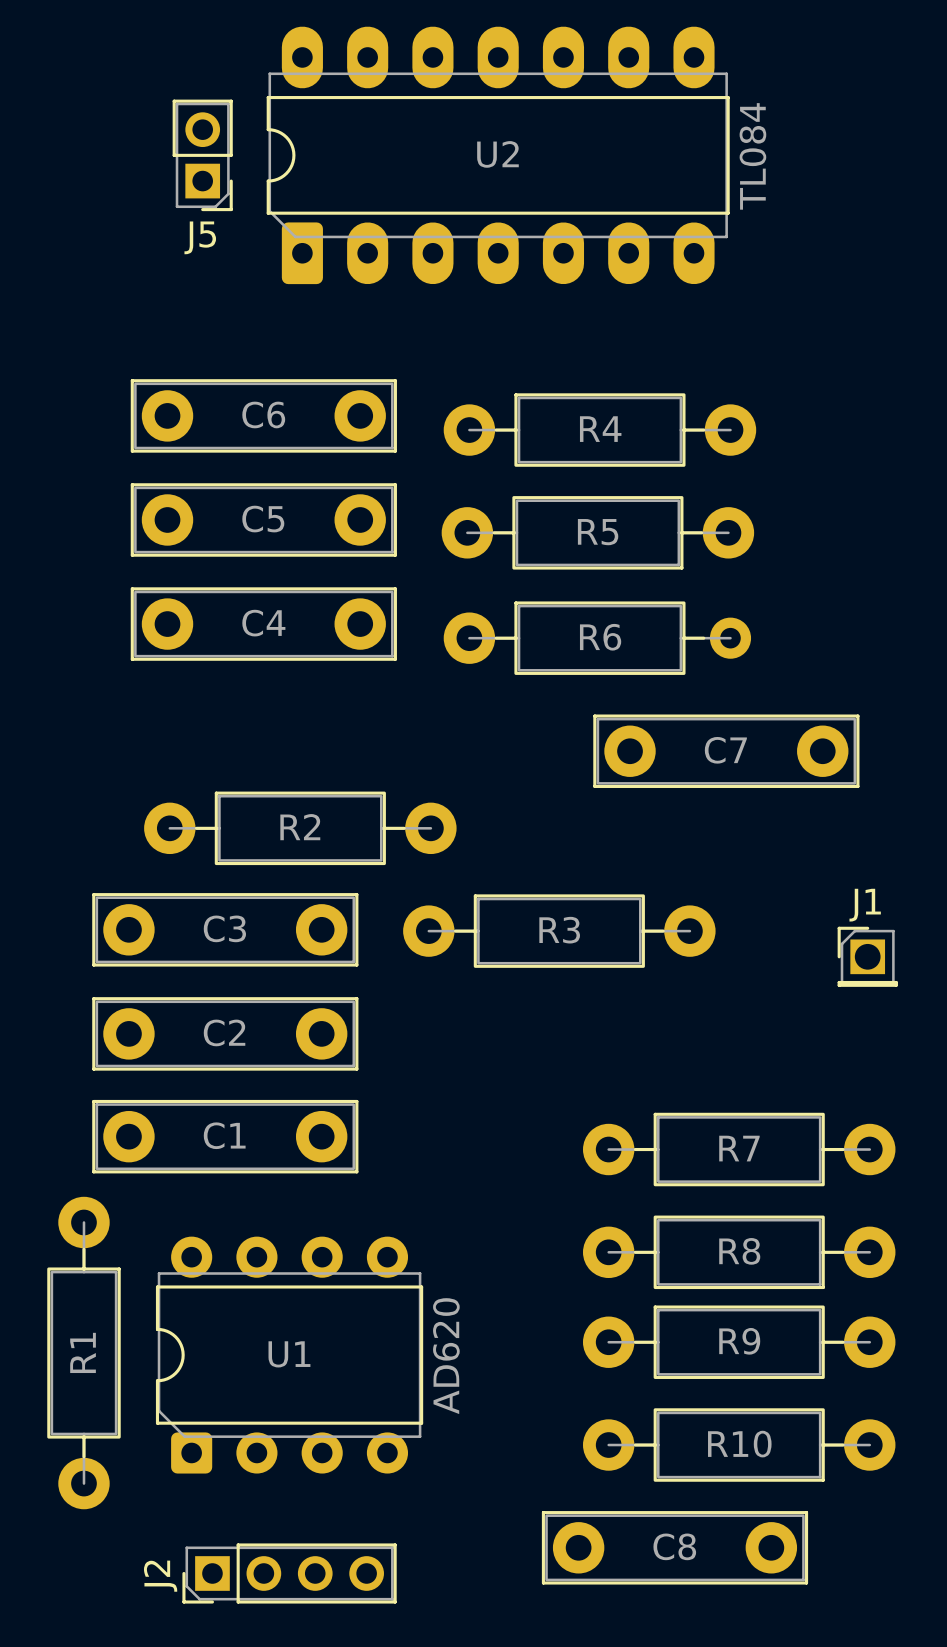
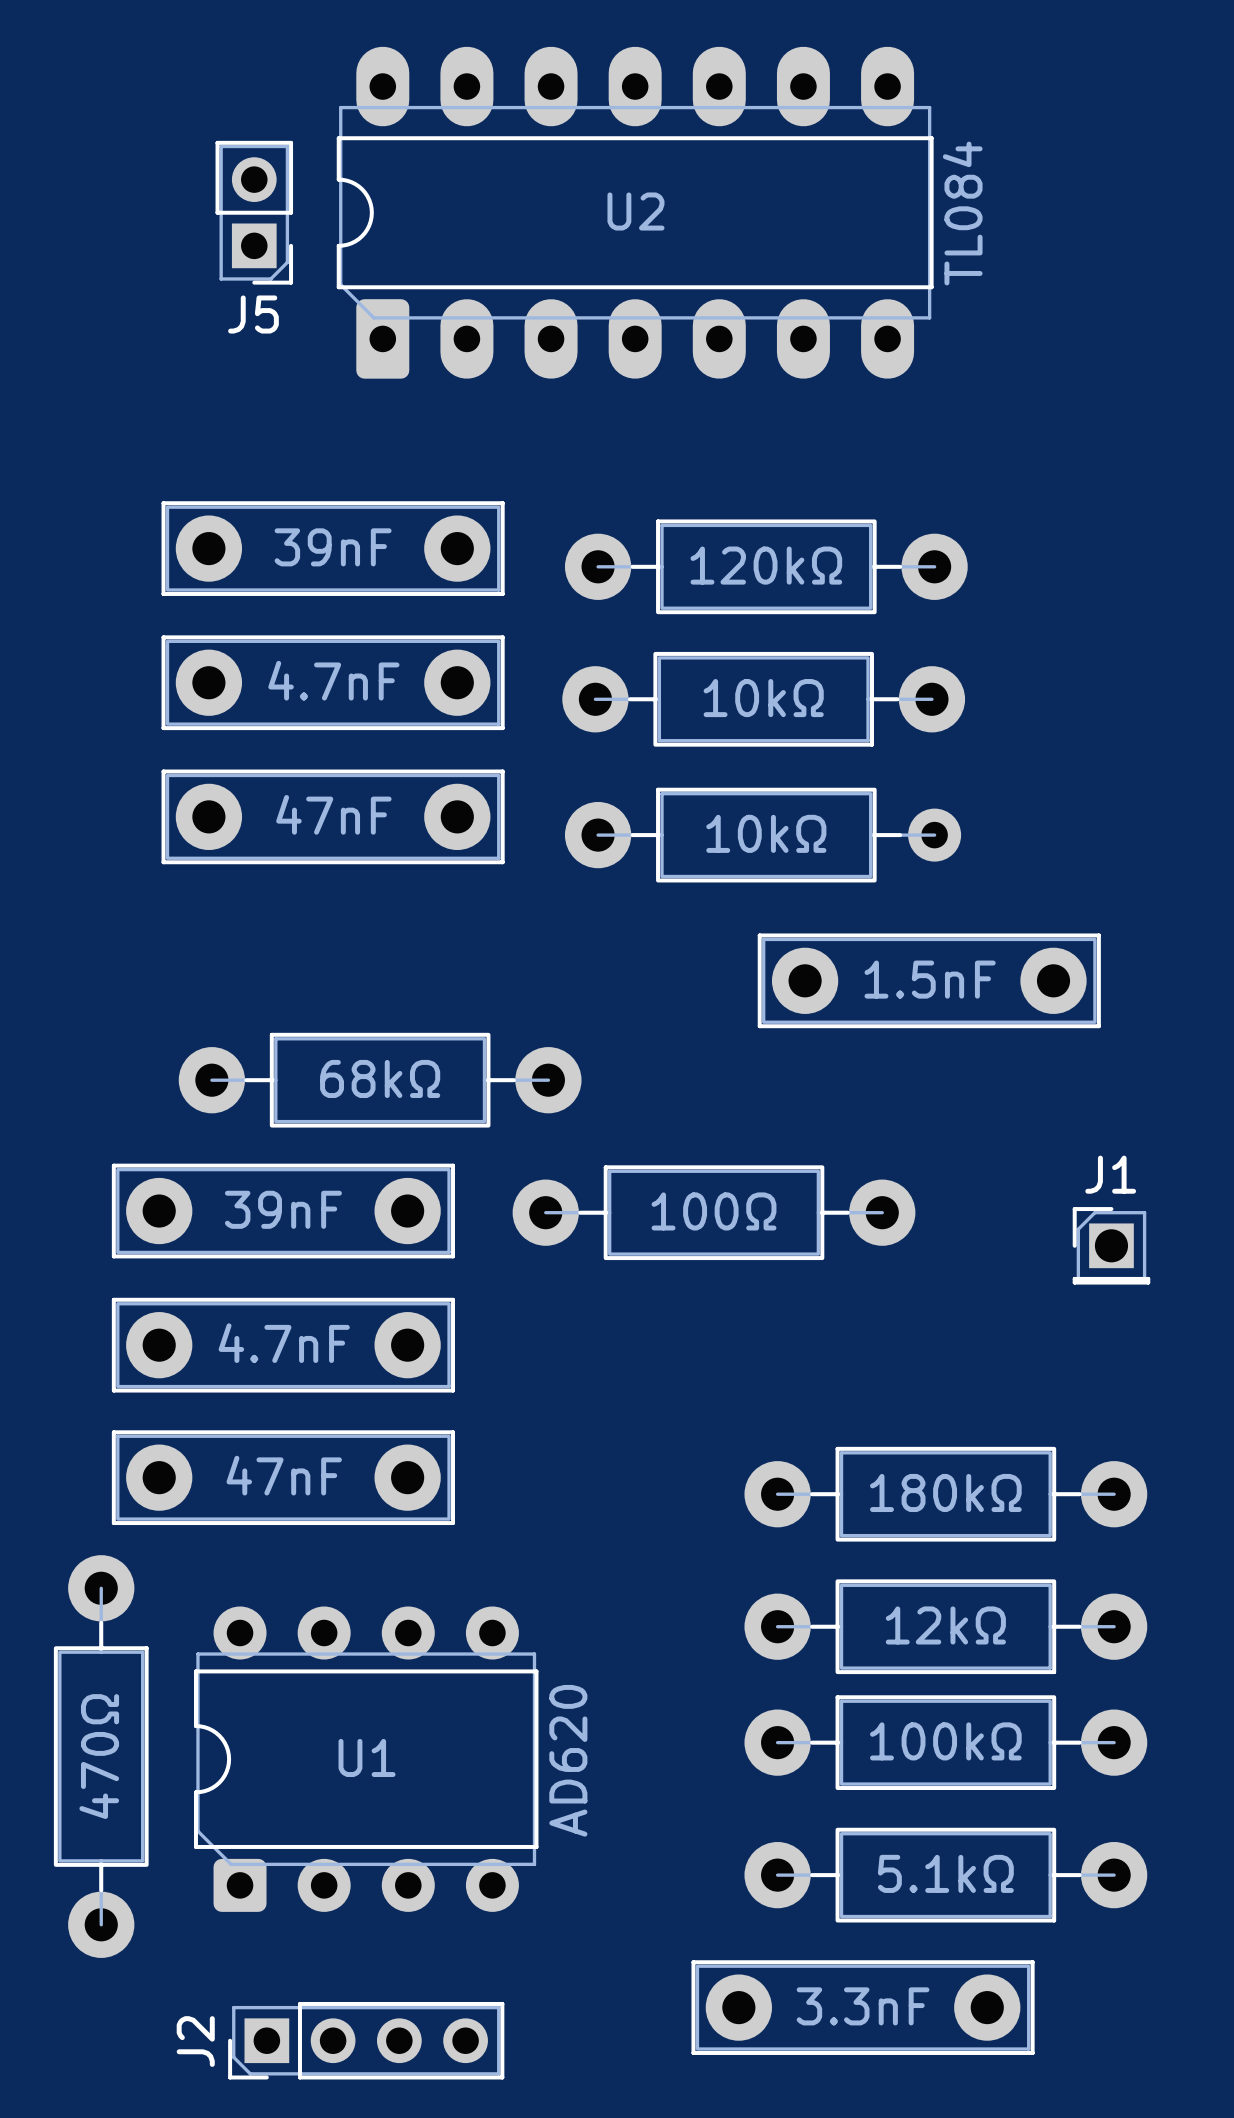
C6 name: C6 (263, 414) -> 39nF (333, 547)
R4 name: R4 (600, 429) -> 120kΩ (766, 565)
C5 name: C5 (263, 519) -> 4.7nF (333, 680)
R5 name: R5 (598, 532) -> 10kΩ (763, 698)
C4 name: C4 (263, 623) -> 47nF (333, 814)
R6 name: R6 (600, 637) -> 10kΩ (766, 833)
C7 name: C7 (725, 750) -> 1.5nF (930, 979)
R2 name: R2 (300, 827) -> 68kΩ (380, 1078)
C3 name: C3 (224, 928) -> 39nF (283, 1209)
R3 name: R3 (559, 930) -> 100Ω (714, 1211)
C2 name: C2 (224, 1032) -> 4.7nF (284, 1343)
C1 name: C1 (224, 1135) -> 47nF (284, 1475)
R7 name: R7 (739, 1148) -> 180kΩ (945, 1492)
R8 name: R8 (739, 1251) -> 12kΩ (945, 1625)
R9 name: R9 (739, 1341) -> 100kΩ (945, 1741)
R1 name: R1 (83, 1352) -> 470Ω (99, 1756)
R10 name: R10 (739, 1444) -> 5.1kΩ (945, 1873)
C8 name: C8 (674, 1546) -> 3.3nF (863, 2006)

